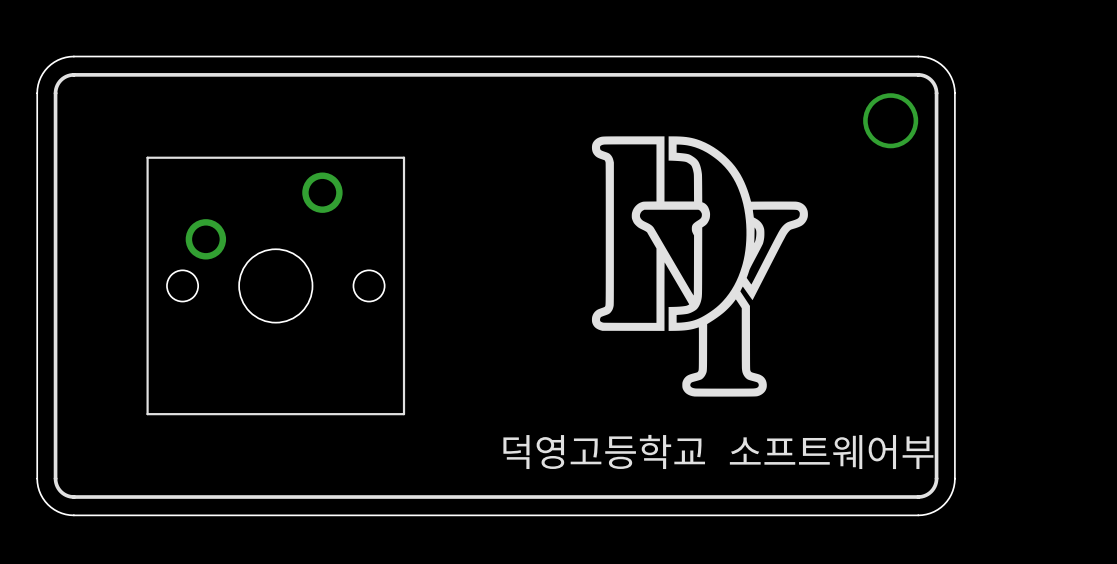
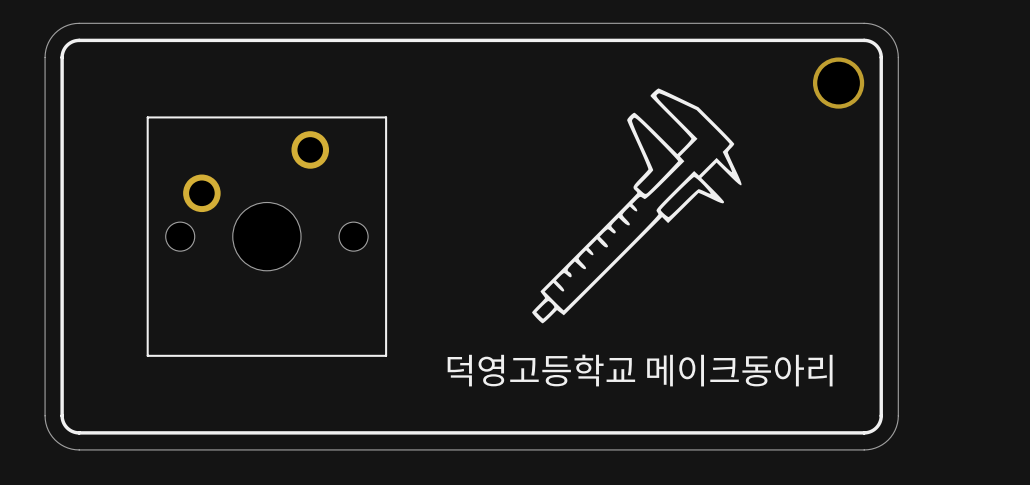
drawing: none -> [532, 88, 742, 324]
drawing: [591, 136, 808, 397] -> none
text: none -> 덕영고등학교 메이크동아리 (640, 370)
text: 덕영고등학교 소프트웨어부 (718, 451) -> none

